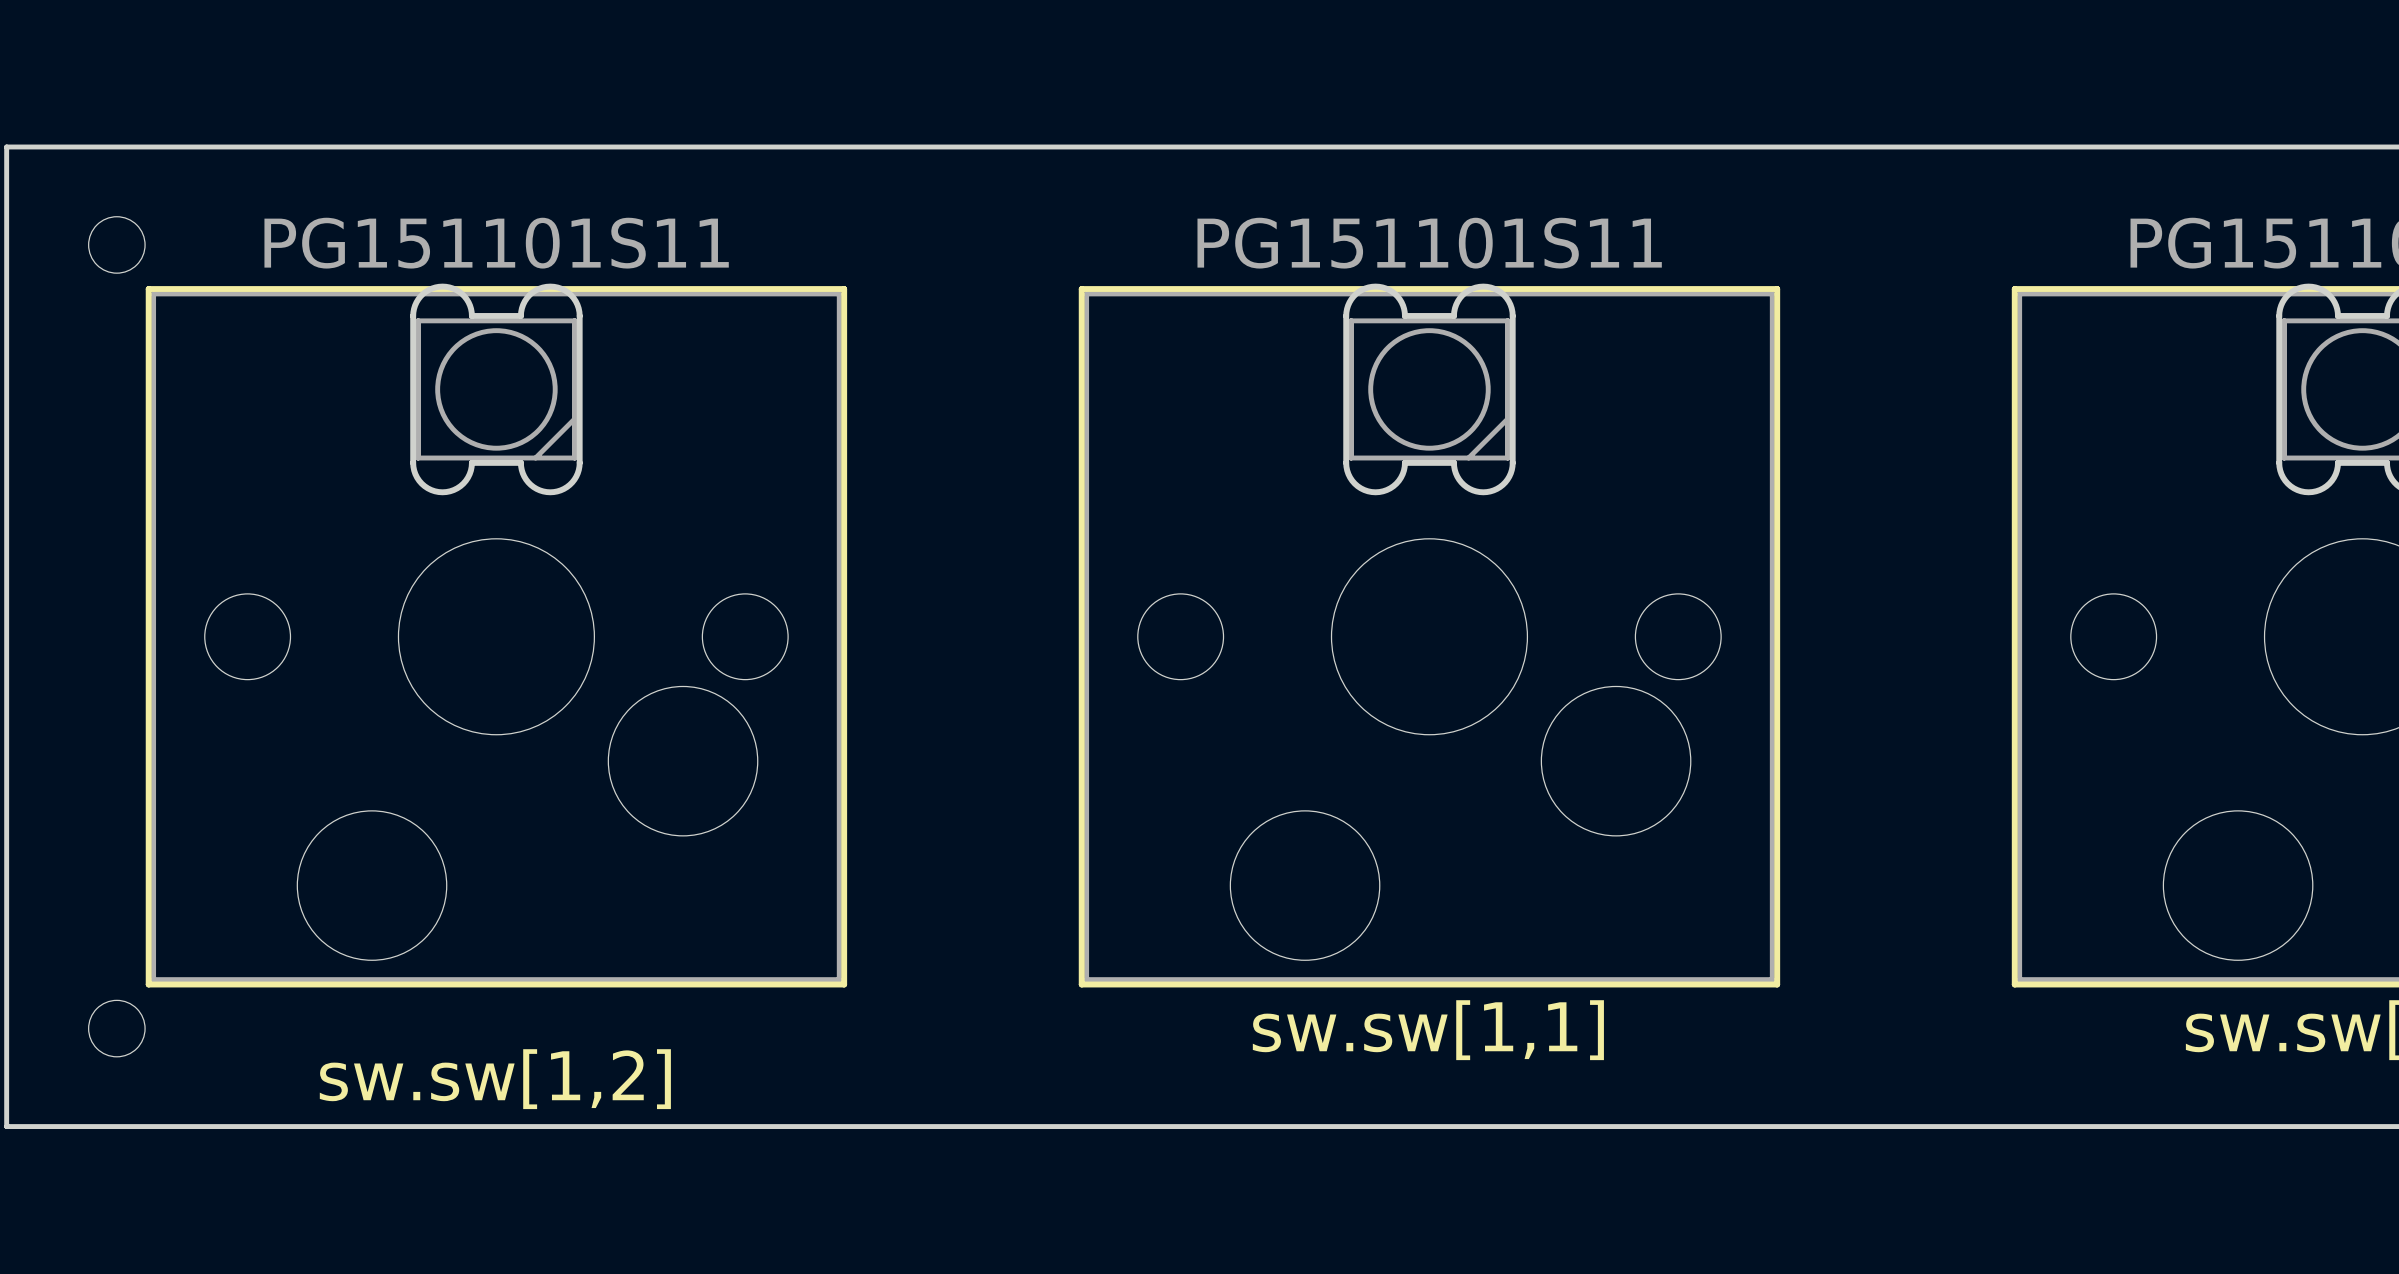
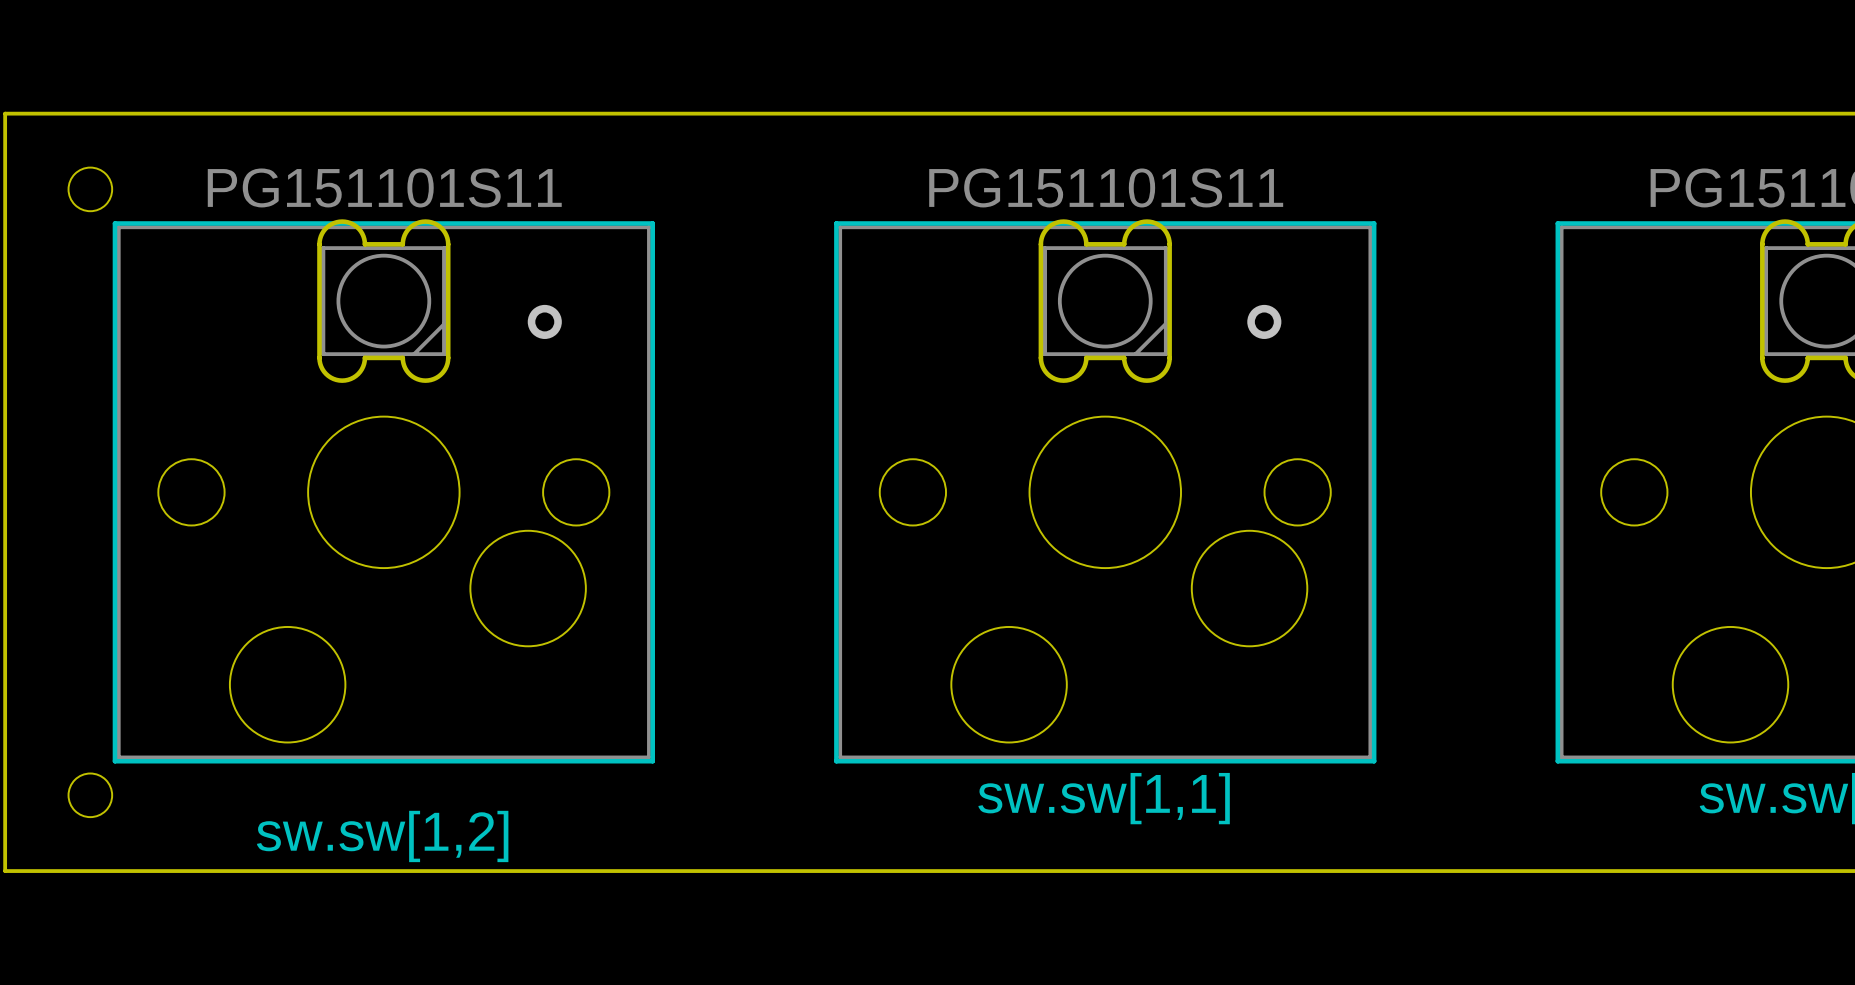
via: none -> (544, 321)
via: none -> (1264, 321)

